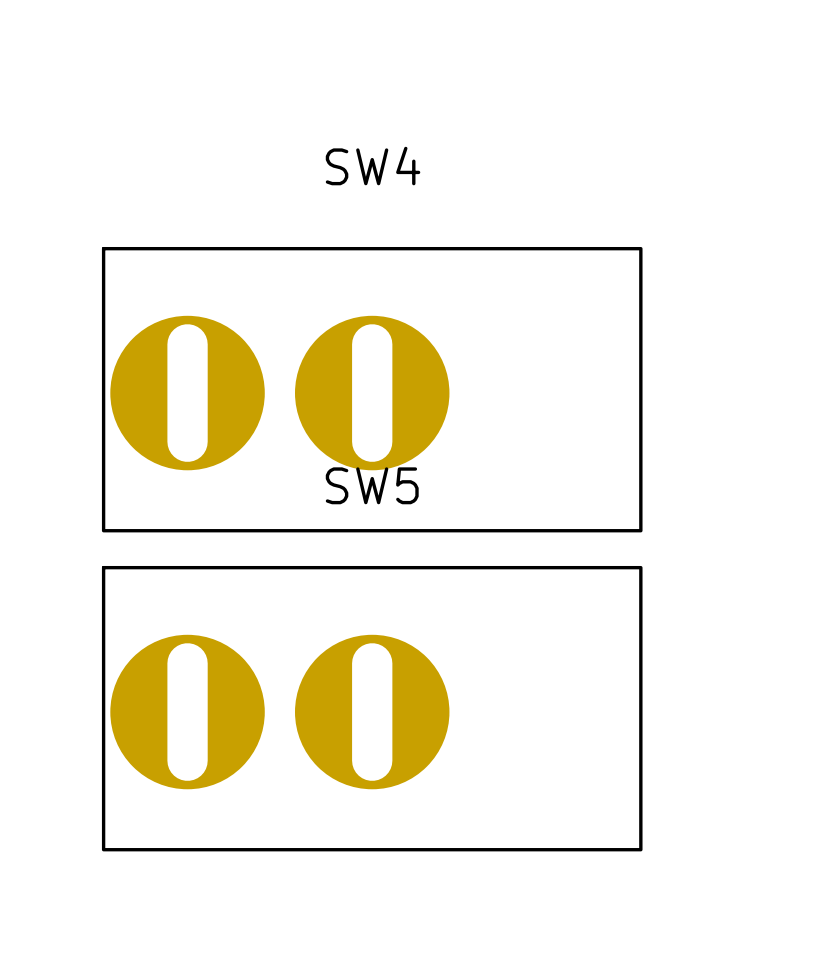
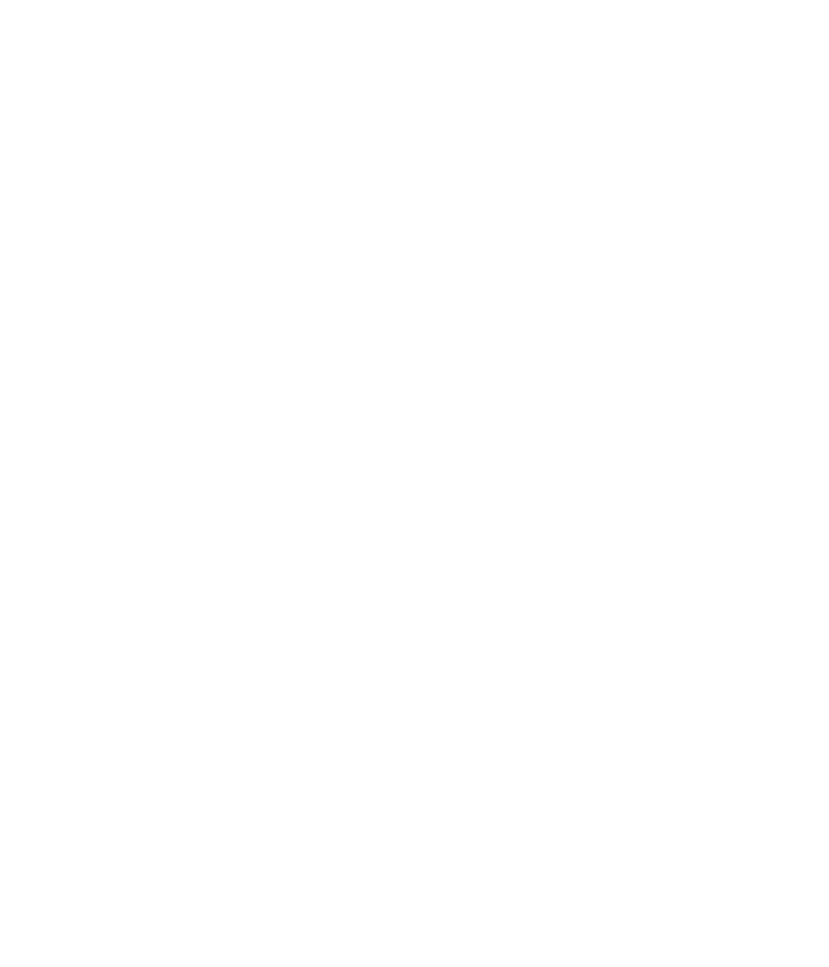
SW4: (372, 389) -> none
SW5: (372, 708) -> none

